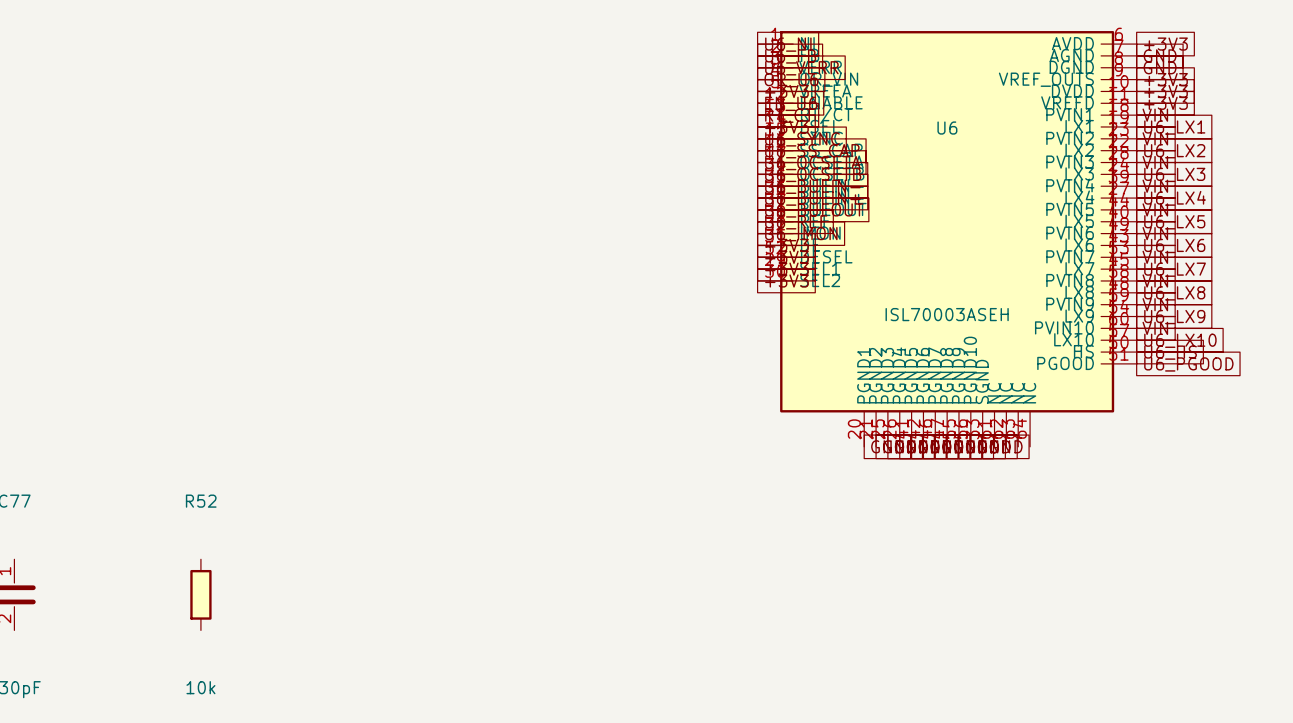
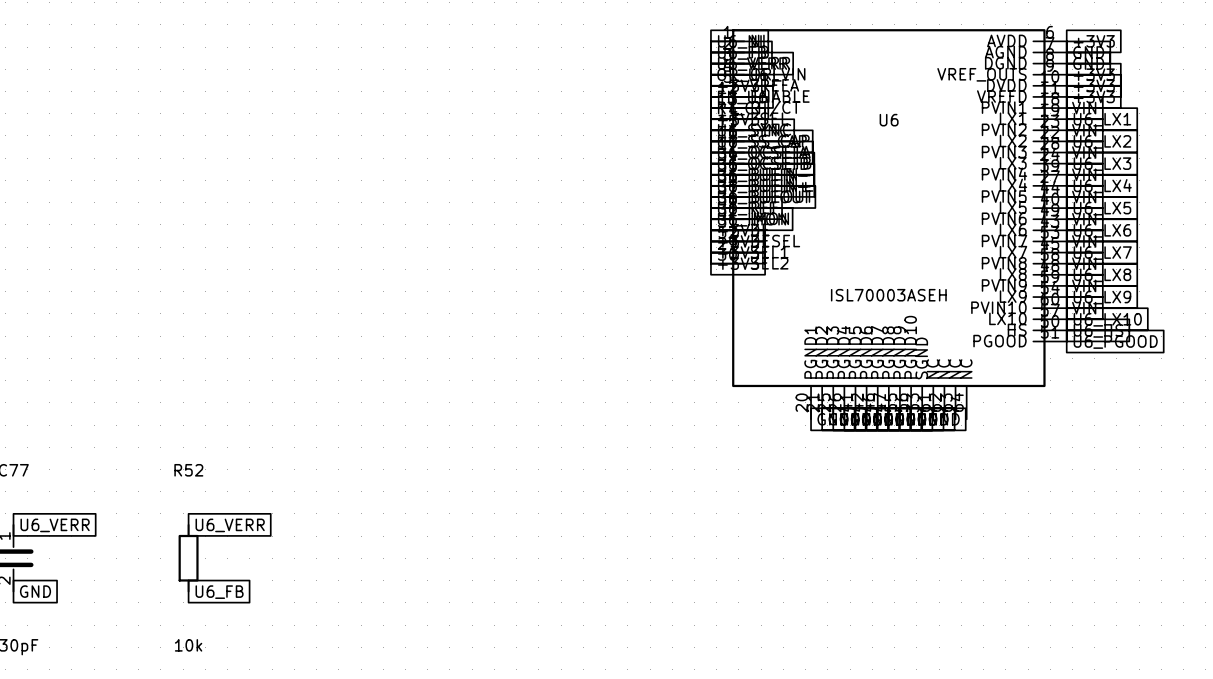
global label: none -> U6_VERR (55, 525)
global label: none -> U6_VERR (230, 525)
global label: none -> GND (35, 591)
global label: none -> U6_FB (219, 592)

